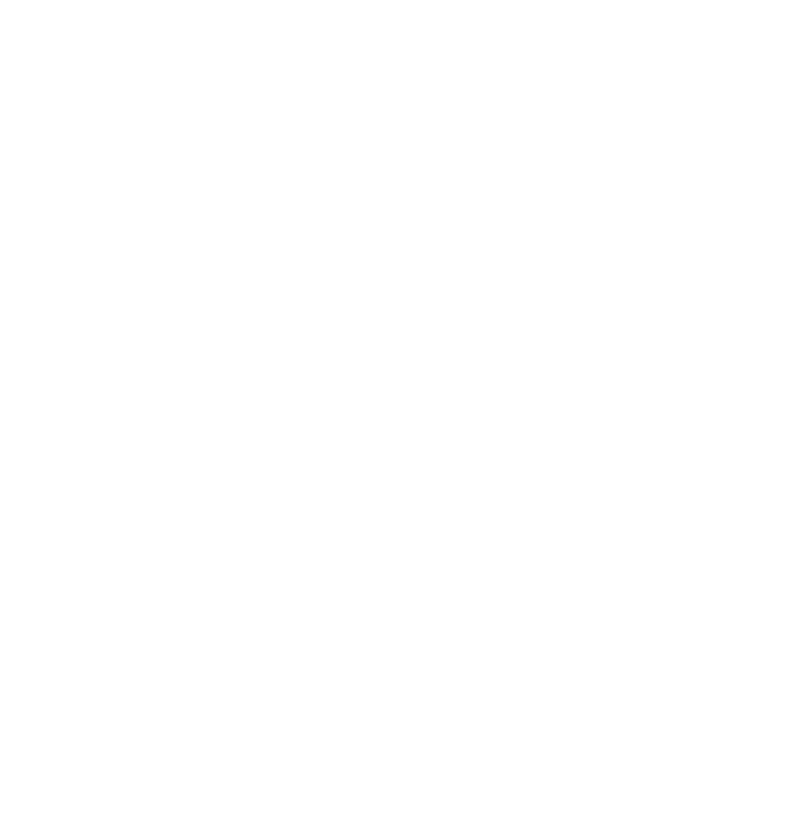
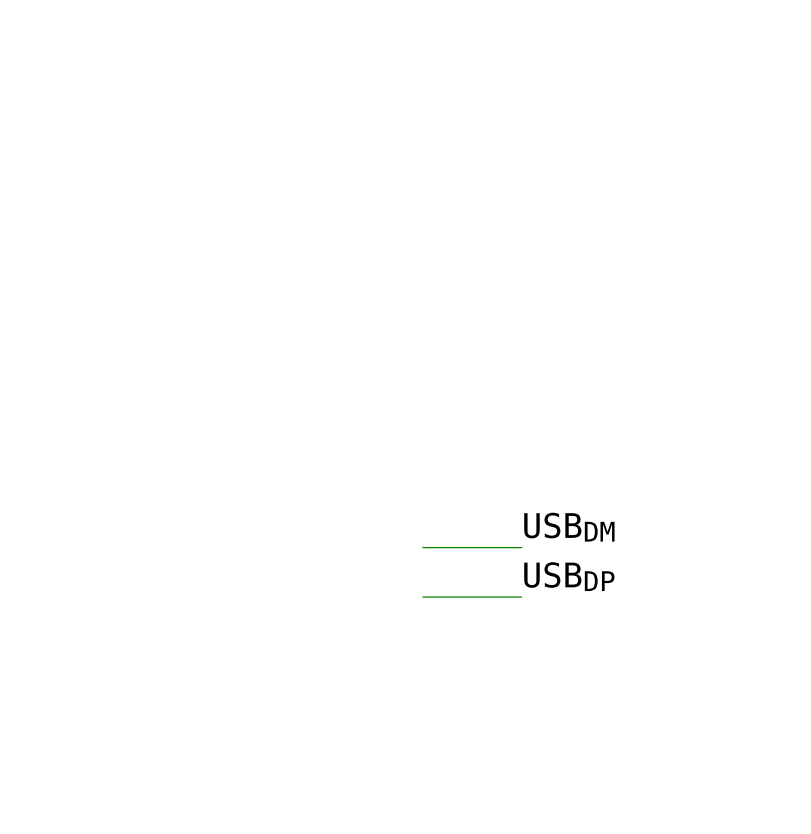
label: none -> USBDM (569, 527)
wire: none -> (422, 547) (521, 547)
label: none -> USBDP (569, 576)
wire: none -> (422, 597) (521, 597)

